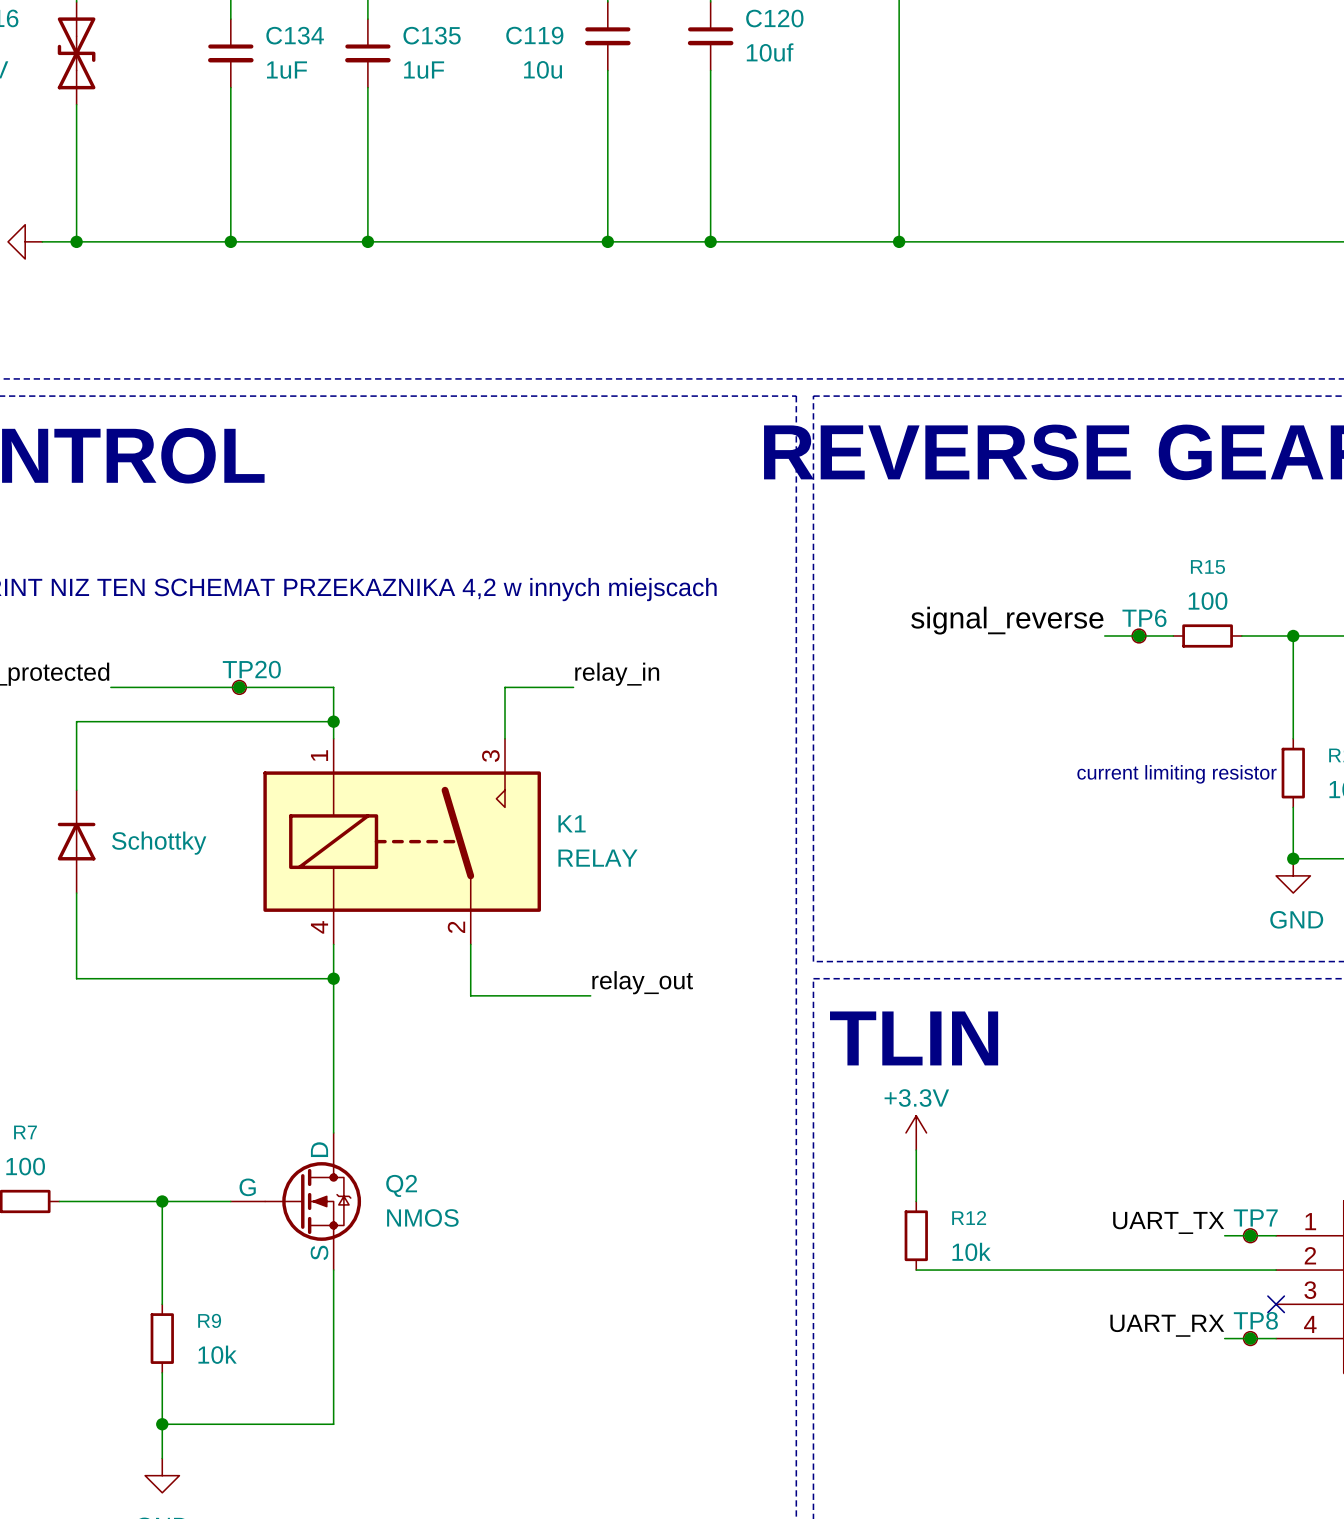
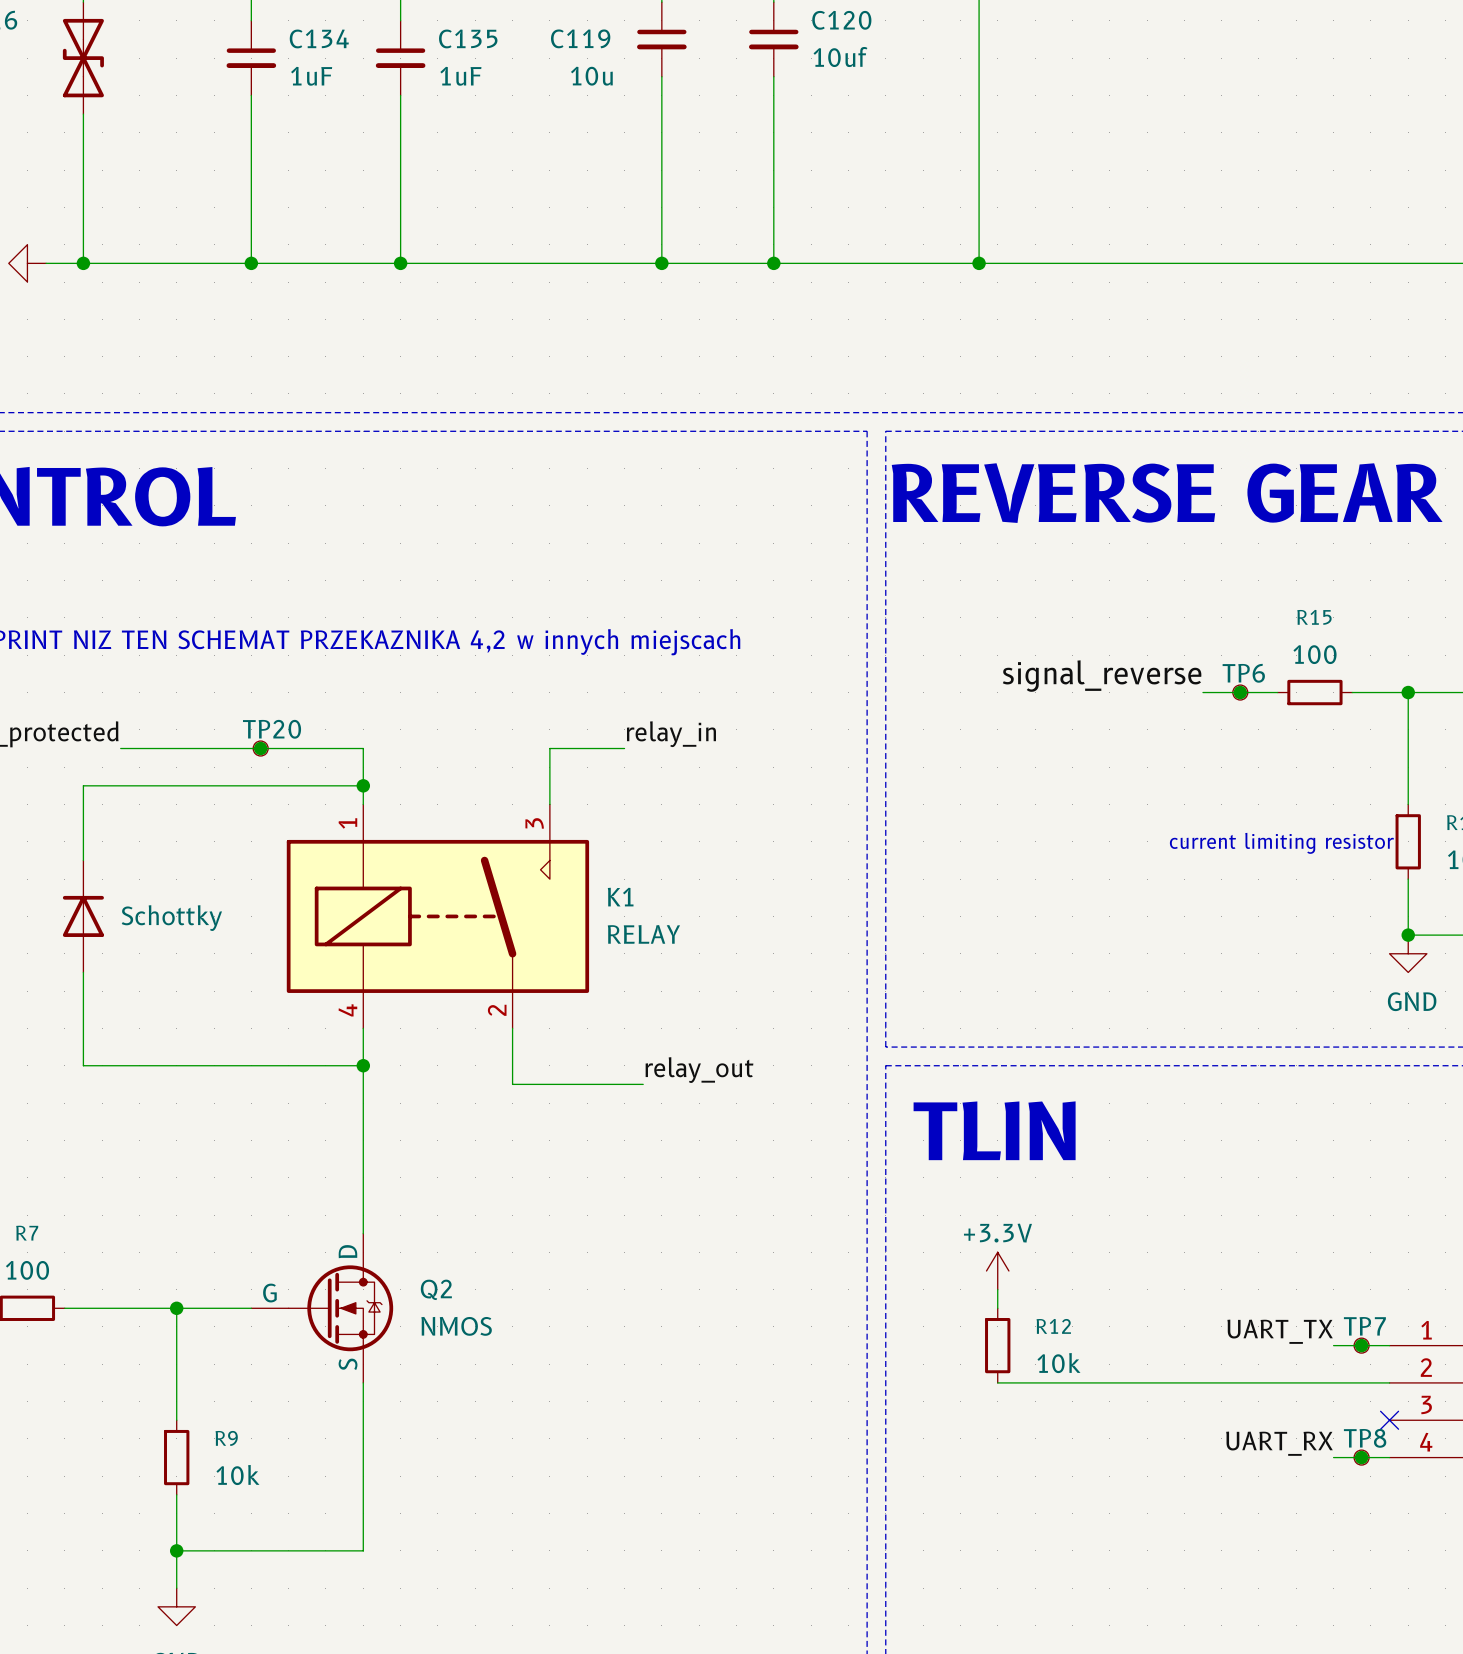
power symbol position: +3.3V (916, 1132) -> +3.3V (997, 1270)

